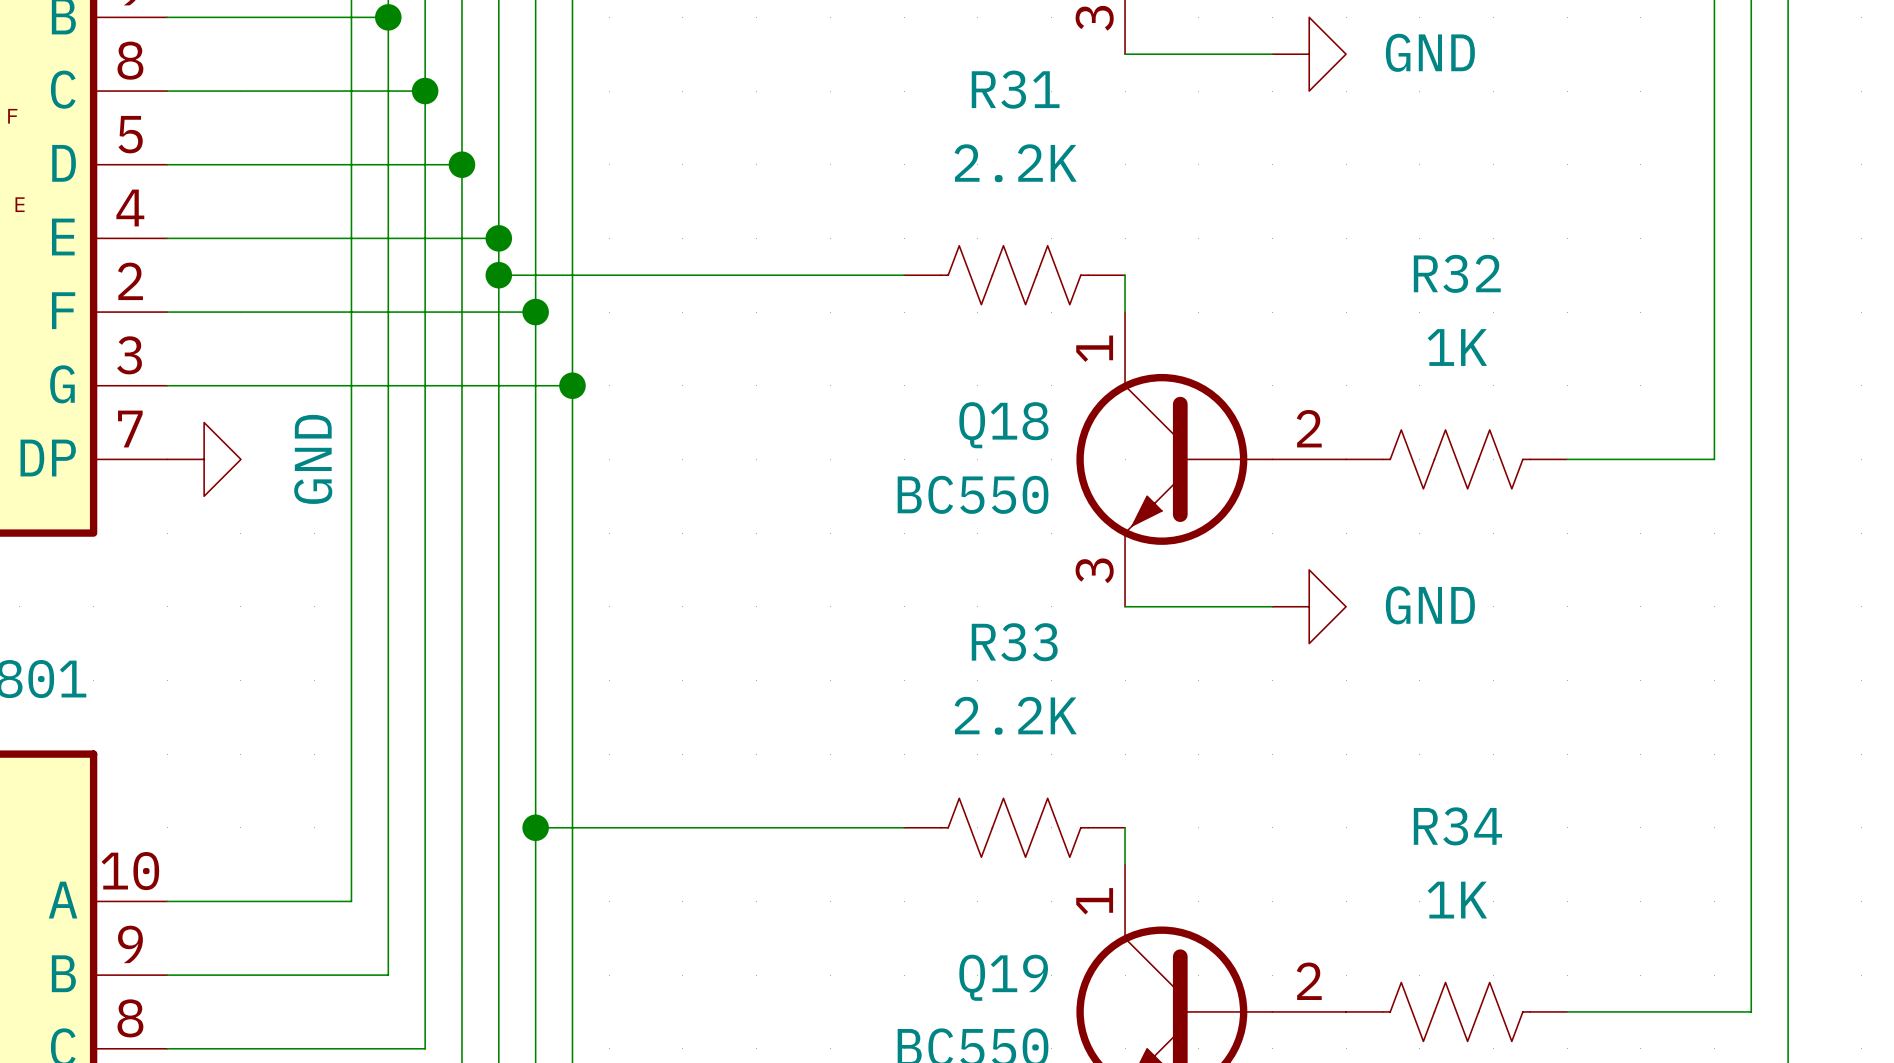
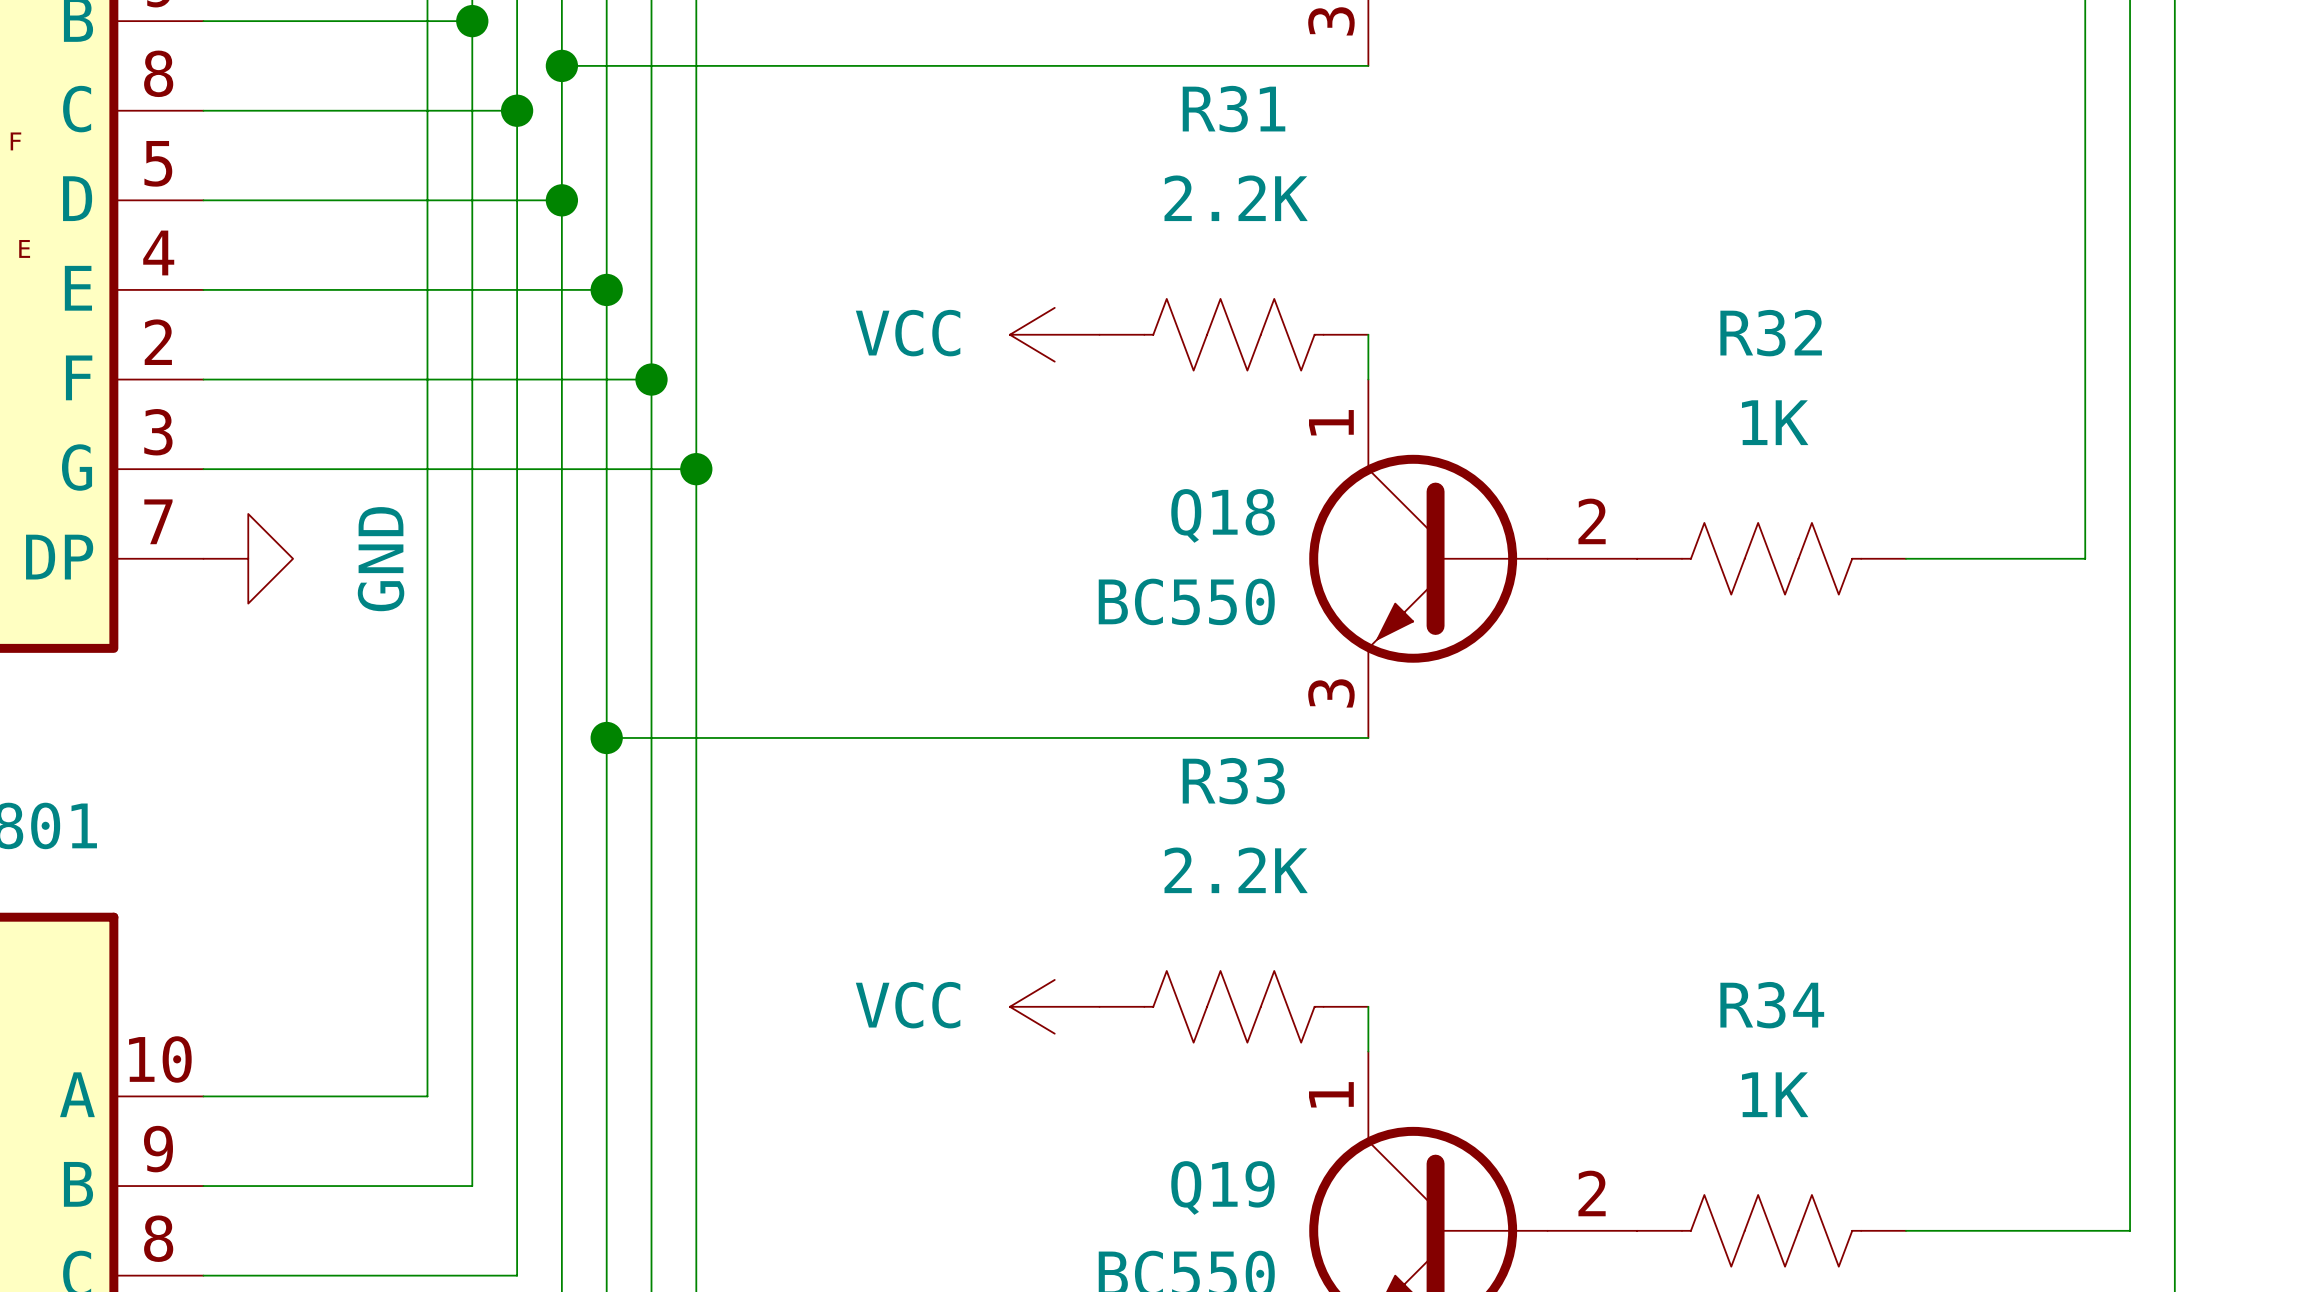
junction: none -> (561, 65)
wire: (1125, 54) (1272, 54) -> (1368, 65) (561, 65)
power symbol: GND (1309, 54) -> none
wire: (498, 275) (904, 275) -> none
junction: (498, 275) -> none
power symbol: none -> VCC (1054, 334)
junction: none -> (606, 737)
wire: (1125, 606) (1272, 606) -> (1368, 737) (606, 737)
power symbol: GND (1309, 606) -> none
wire: (535, 827) (904, 827) -> none
junction: (535, 827) -> none
power symbol: none -> VCC (1054, 1006)

